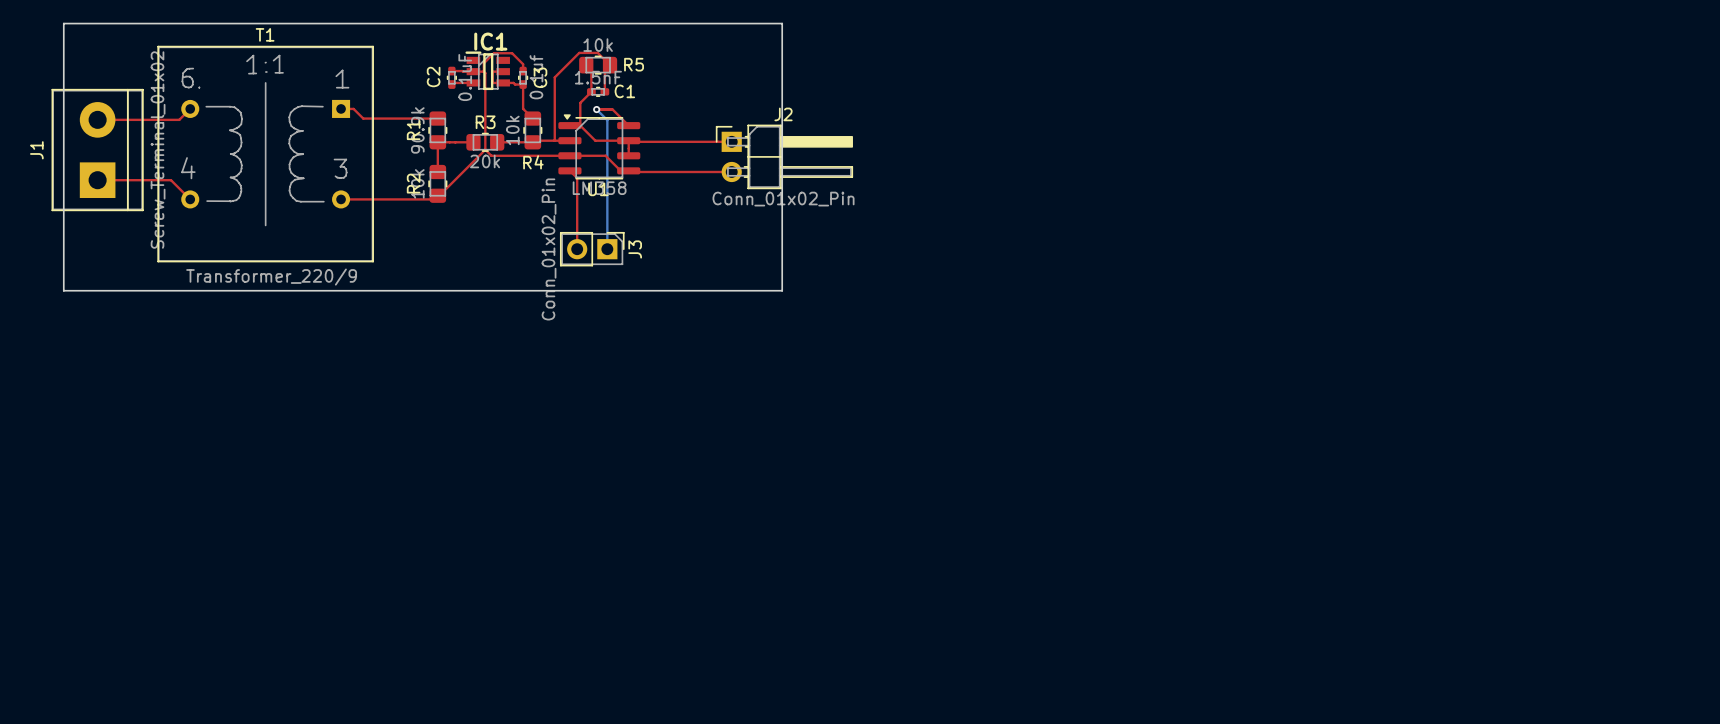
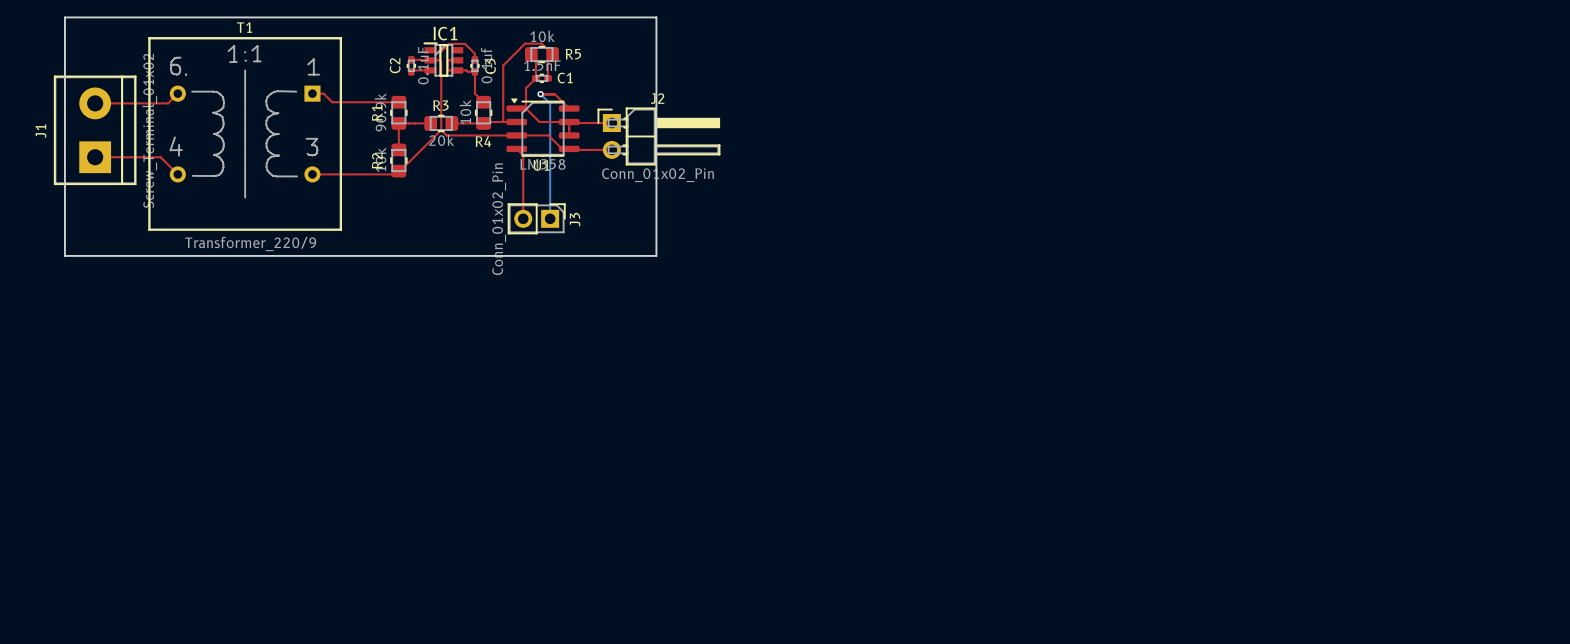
board edge: (726, 23) (782, 23) (782, 290) (726, 290) -> (656, 17) (656, 255)
top track: (676, 141) (731, 141) -> none
J2 position: (784, 156) -> (658, 136)
top track: (676, 171) (731, 171) -> none

